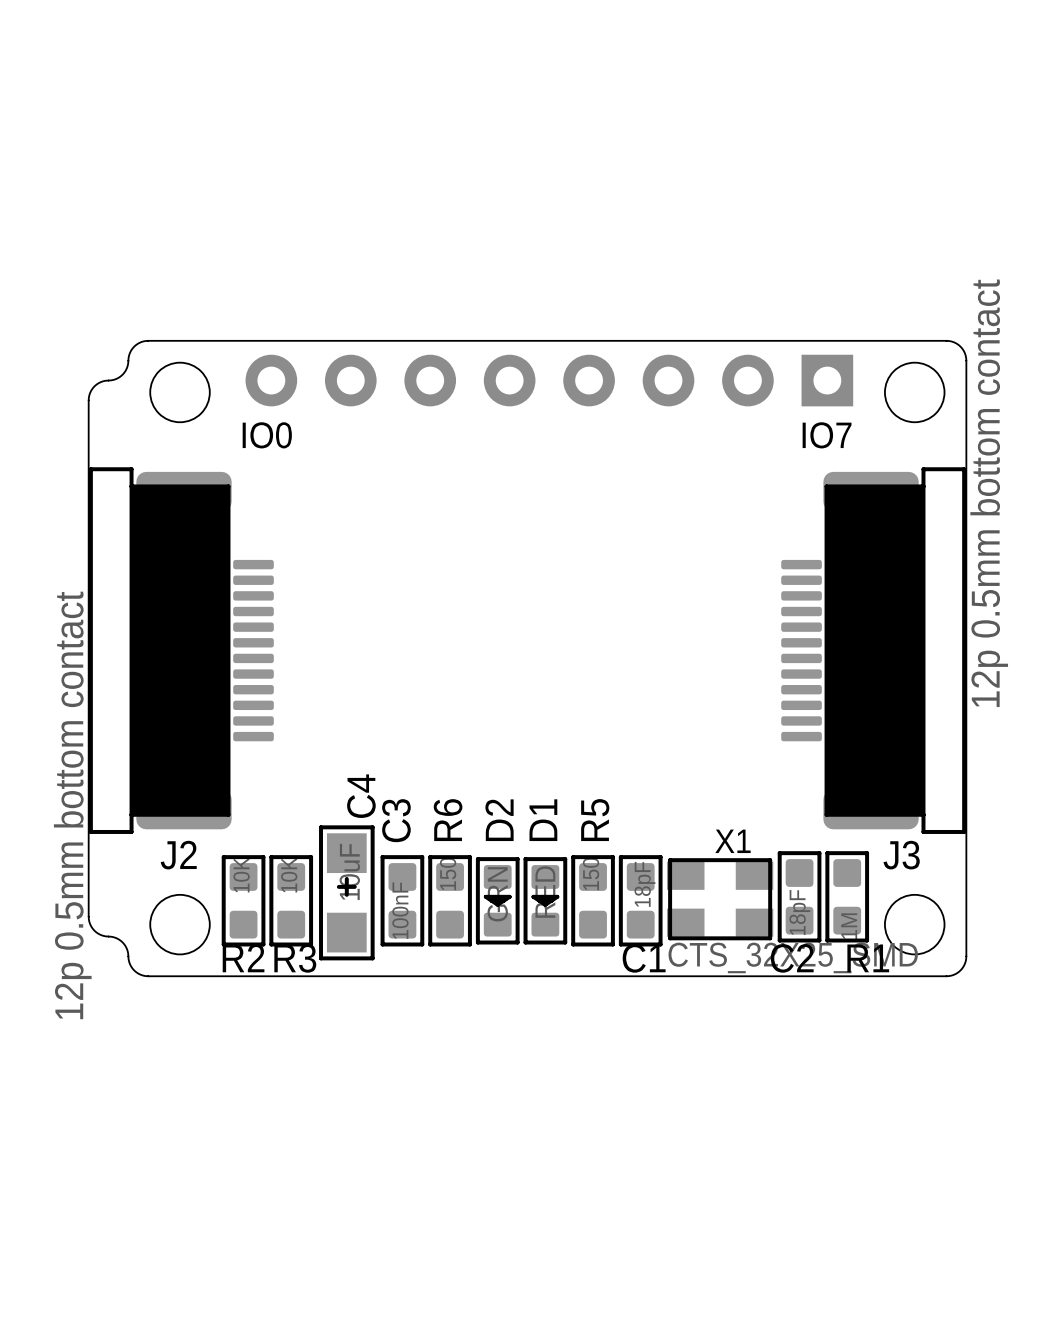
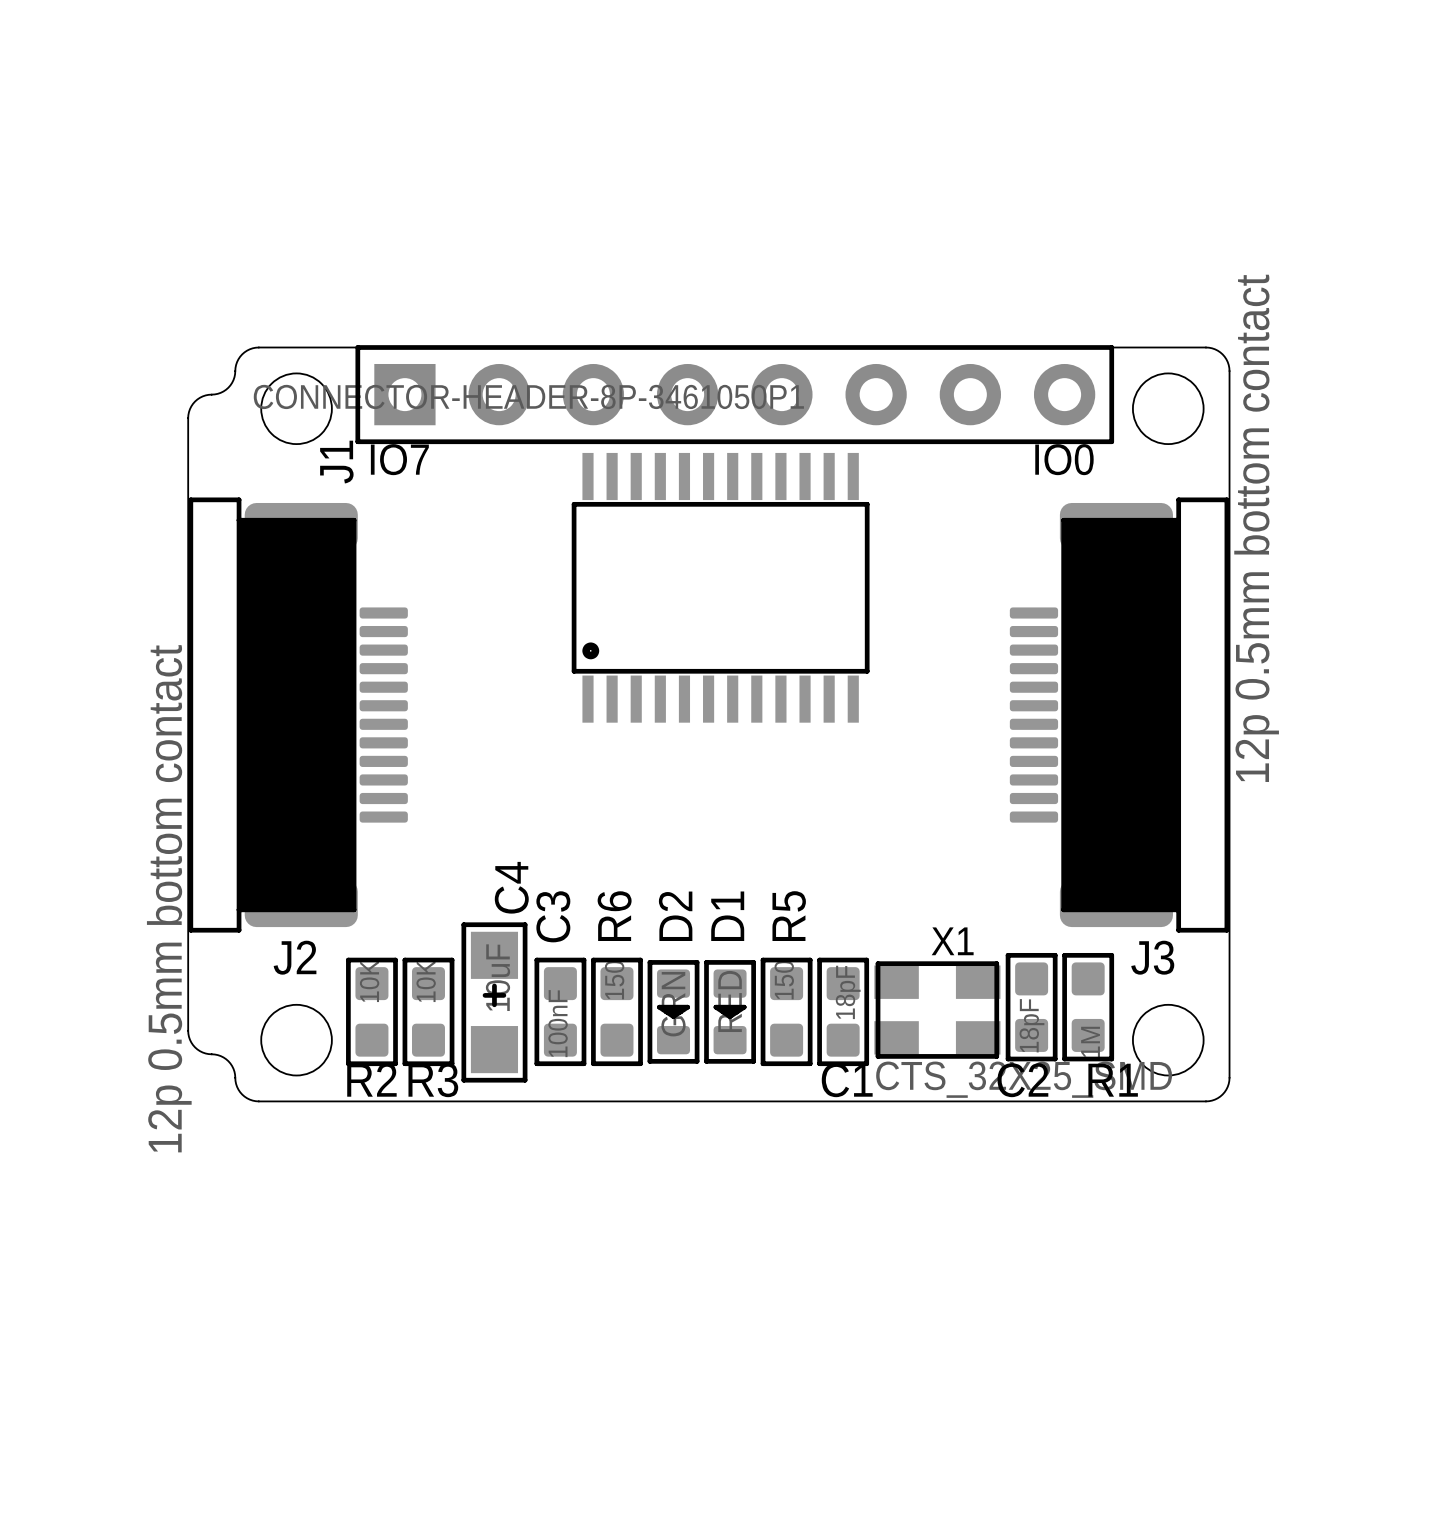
J1 side: bottom (549, 380) -> top (734, 394)
text: IO0 (267, 435) -> IO7 (399, 459)
text: IO7 (827, 435) -> IO0 (1064, 459)
part: none -> (720, 587)

